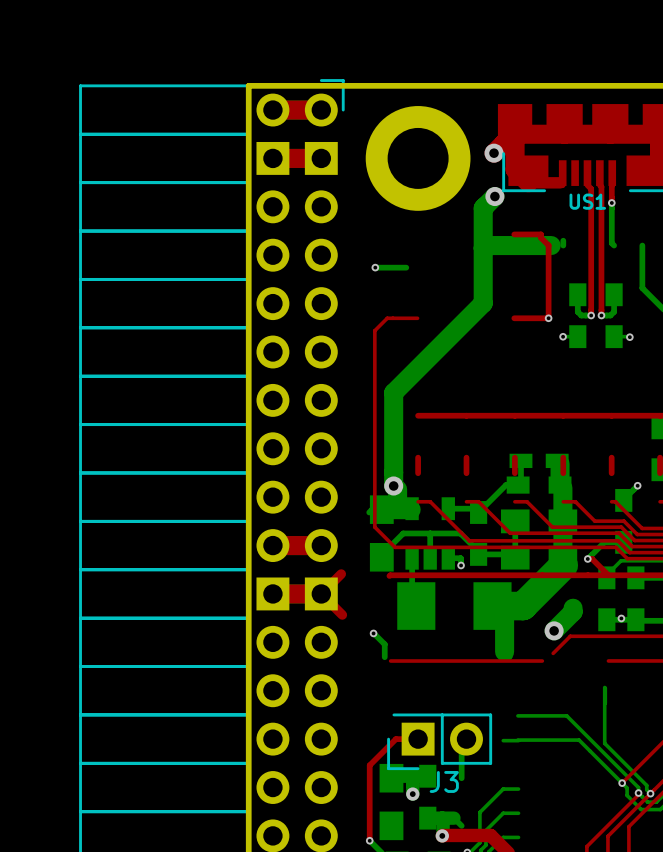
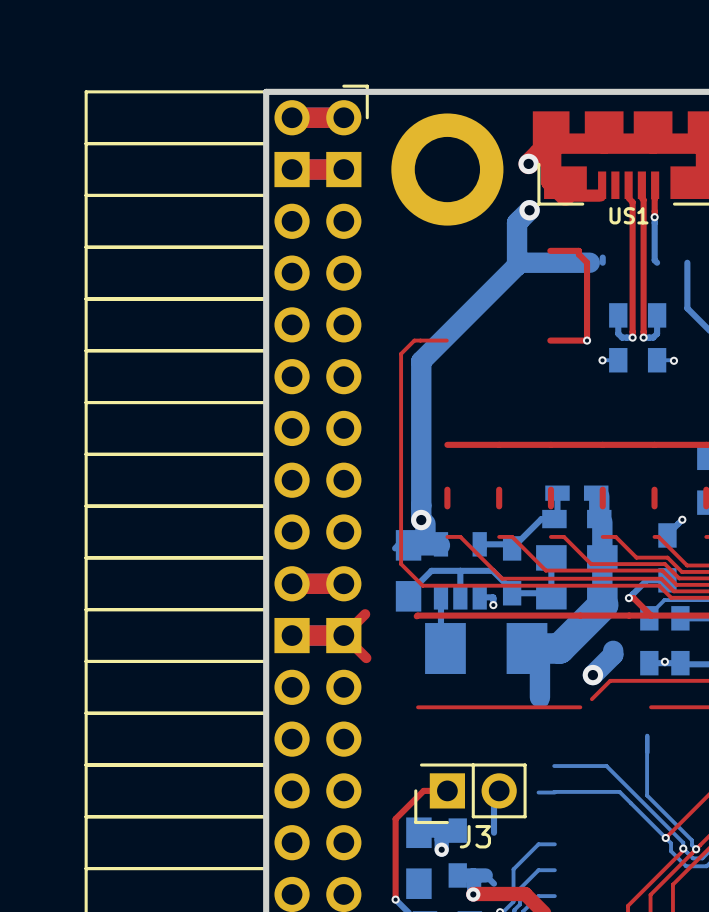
bottom track: (483, 248) (483, 303) (393, 392) -> (517, 265) (421, 361) (421, 420)
bottom track: (375, 267) (406, 267) -> none
via: (375, 267) -> none
bottom track: (373, 633) (384, 644) (384, 657) -> none
via: (373, 633) -> none

